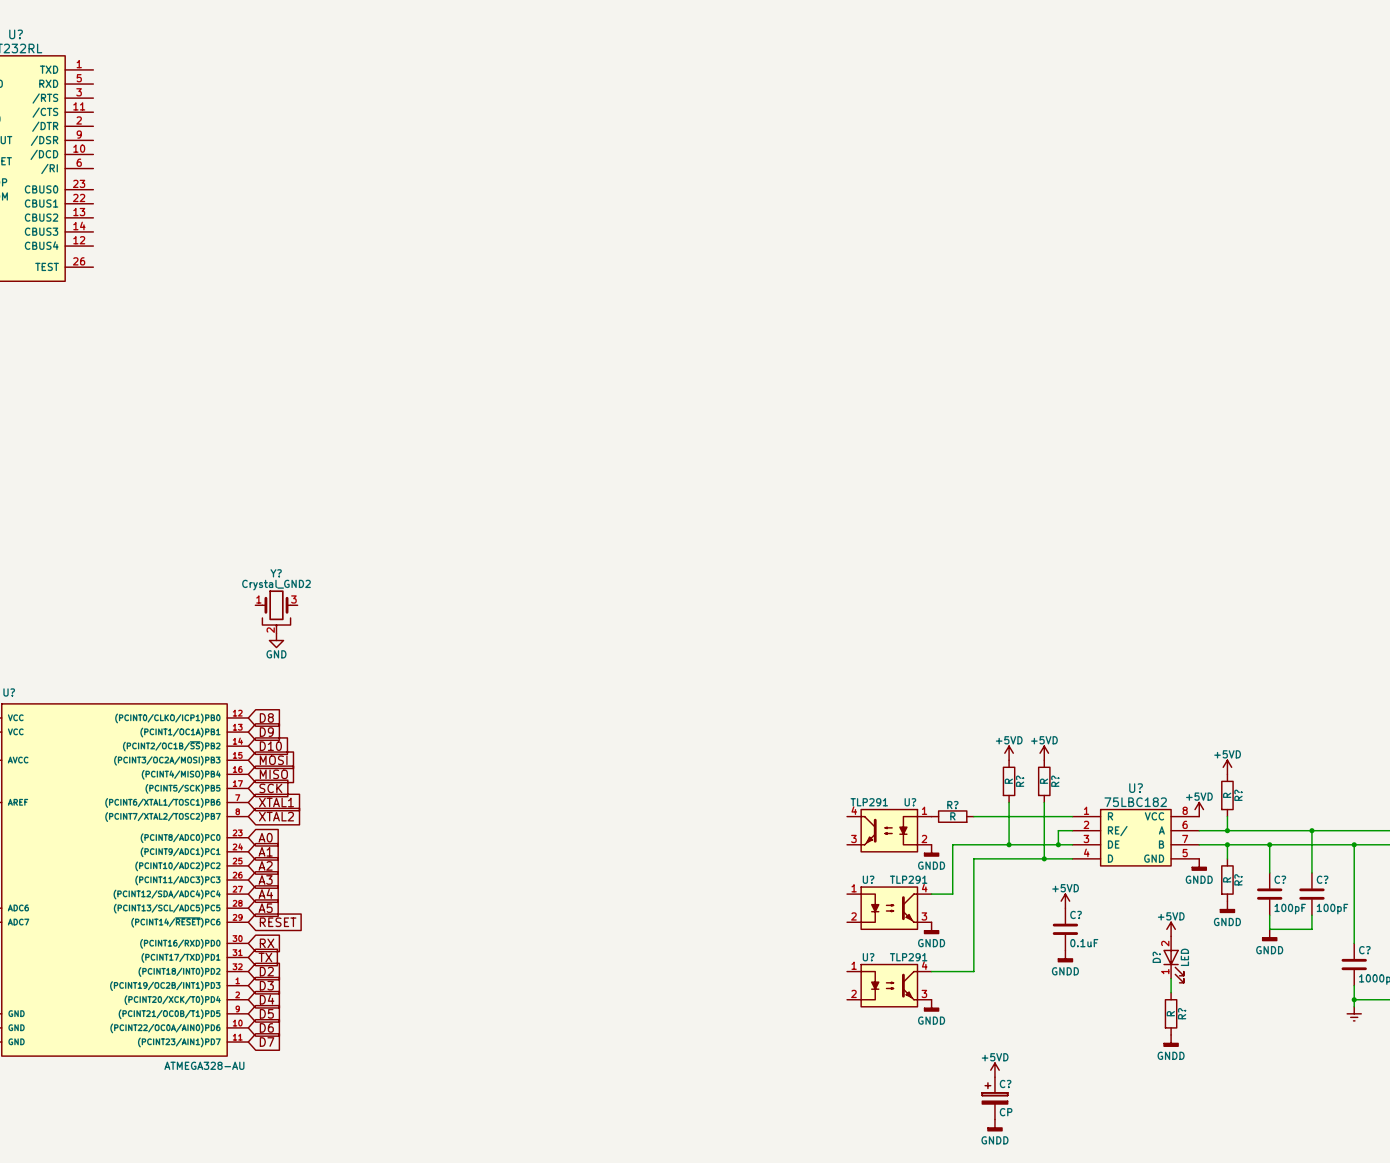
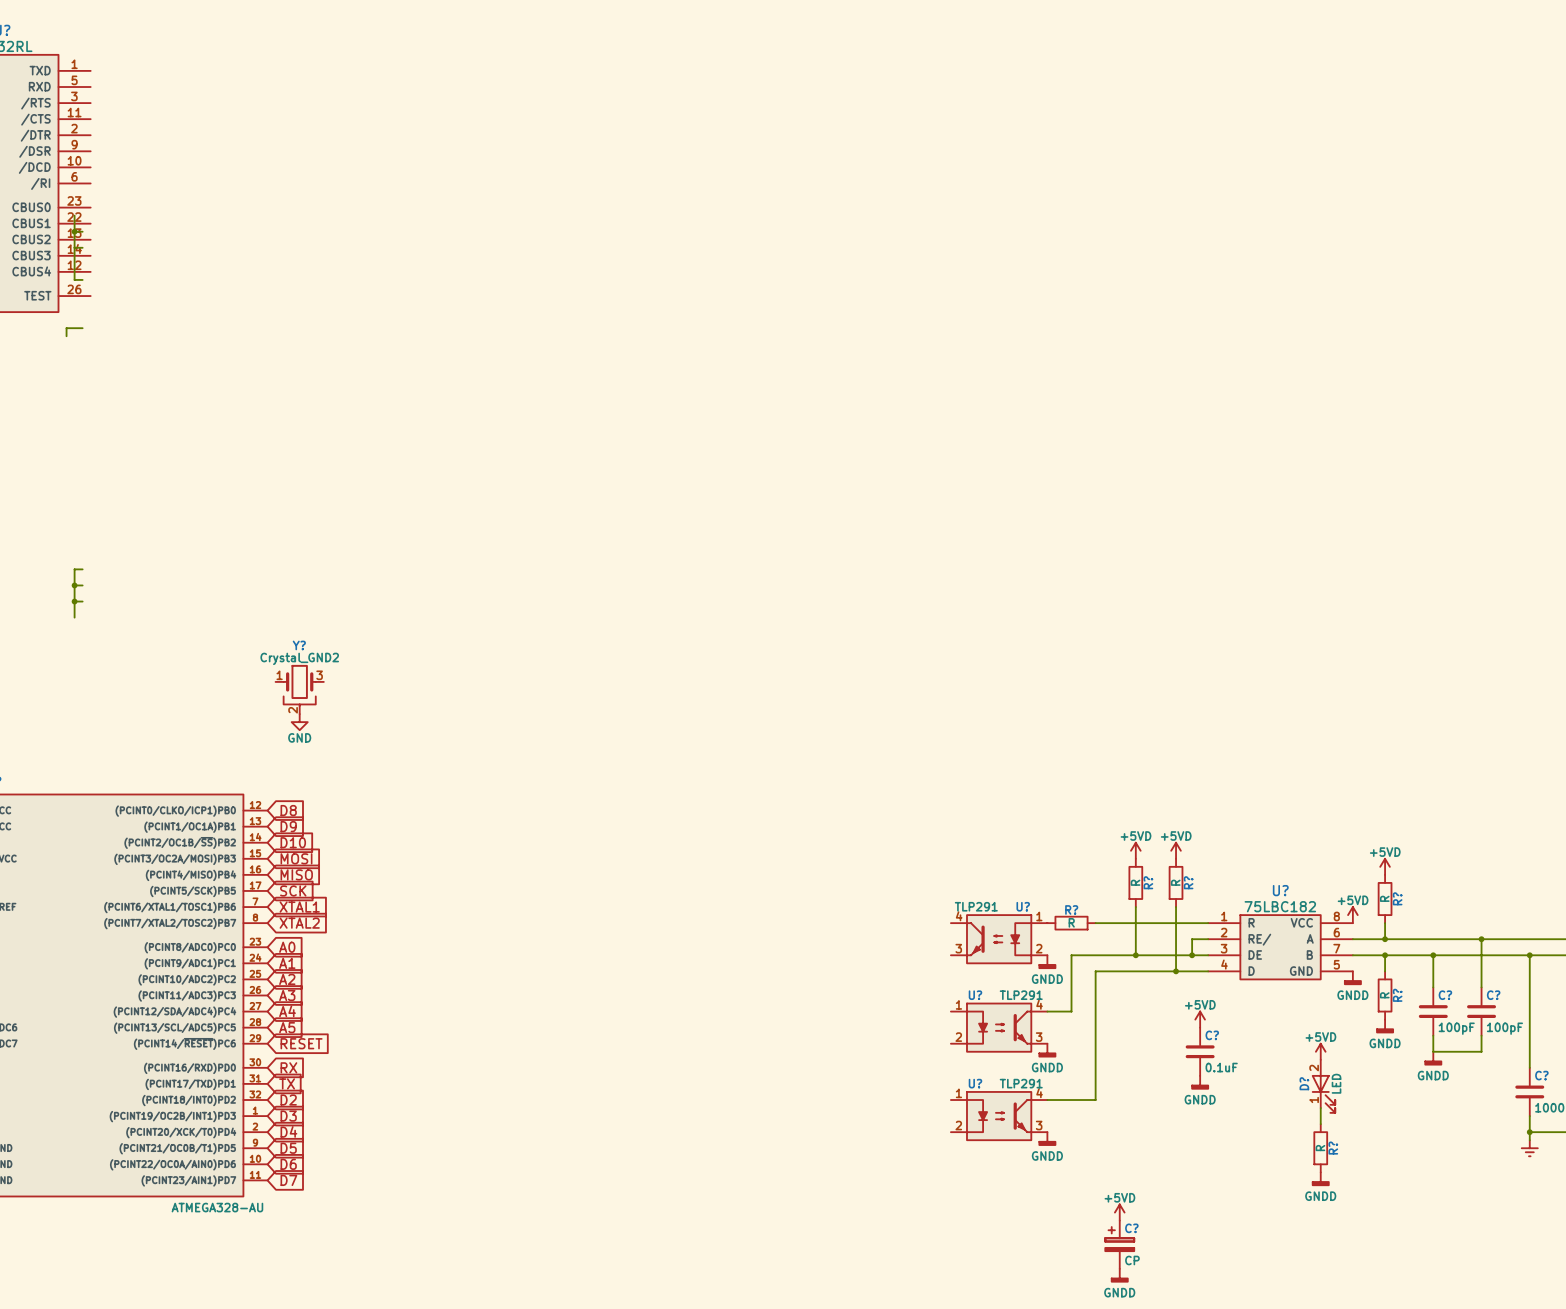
wire: none -> (74, 215) (74, 279) (82, 279)
wire: none -> (74, 231) (82, 231)
junction: none -> (74, 231)
wire: none -> (74, 247) (82, 247)
wire: none -> (82, 328) (66, 328) (66, 336)
wire: none -> (82, 569) (74, 569) (74, 617)
wire: none -> (74, 585) (82, 585)
junction: none -> (74, 585)
wire: none -> (74, 601) (82, 601)
junction: none -> (74, 601)

